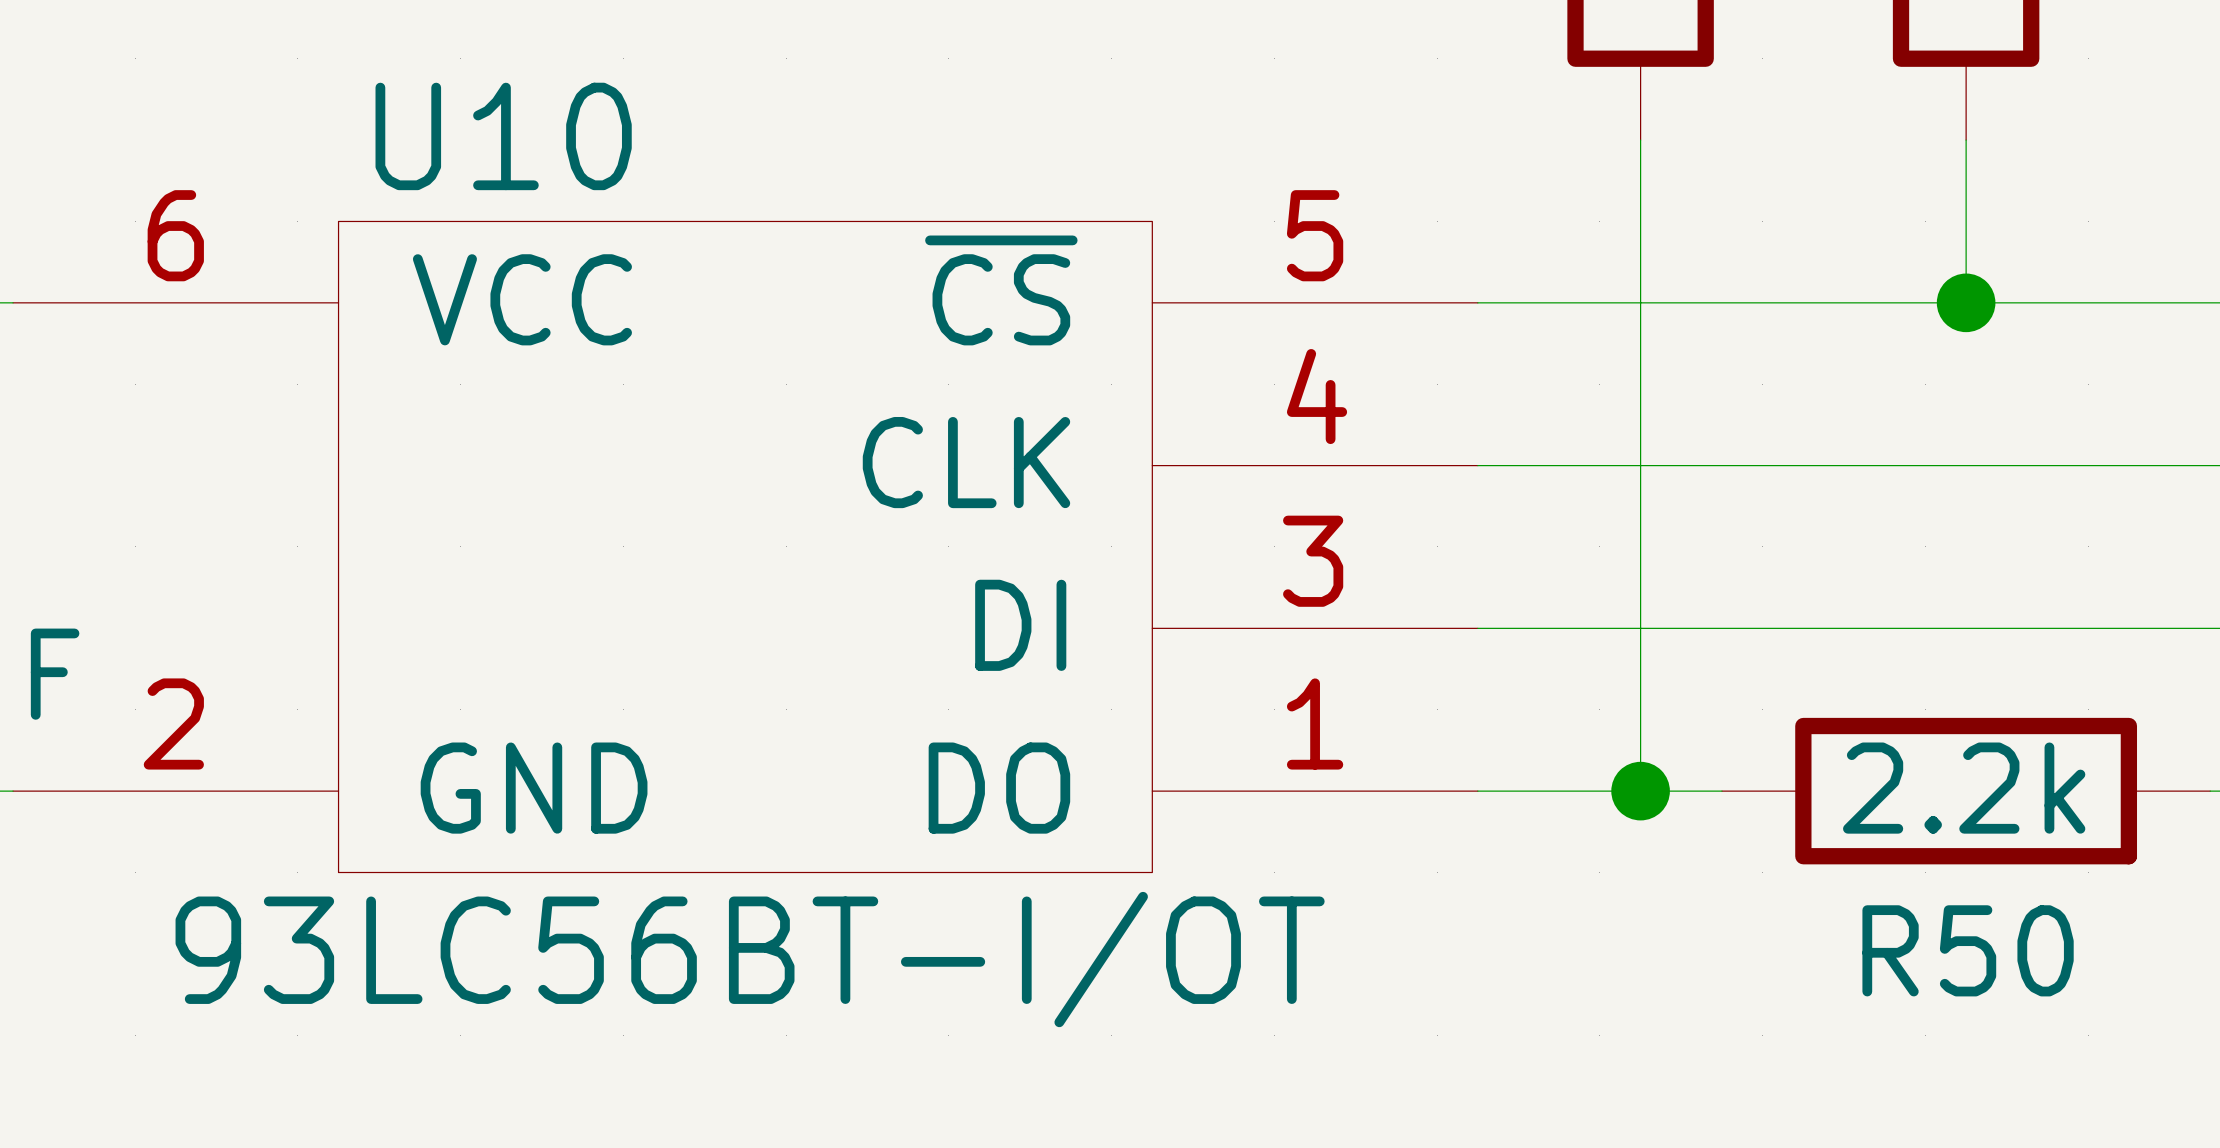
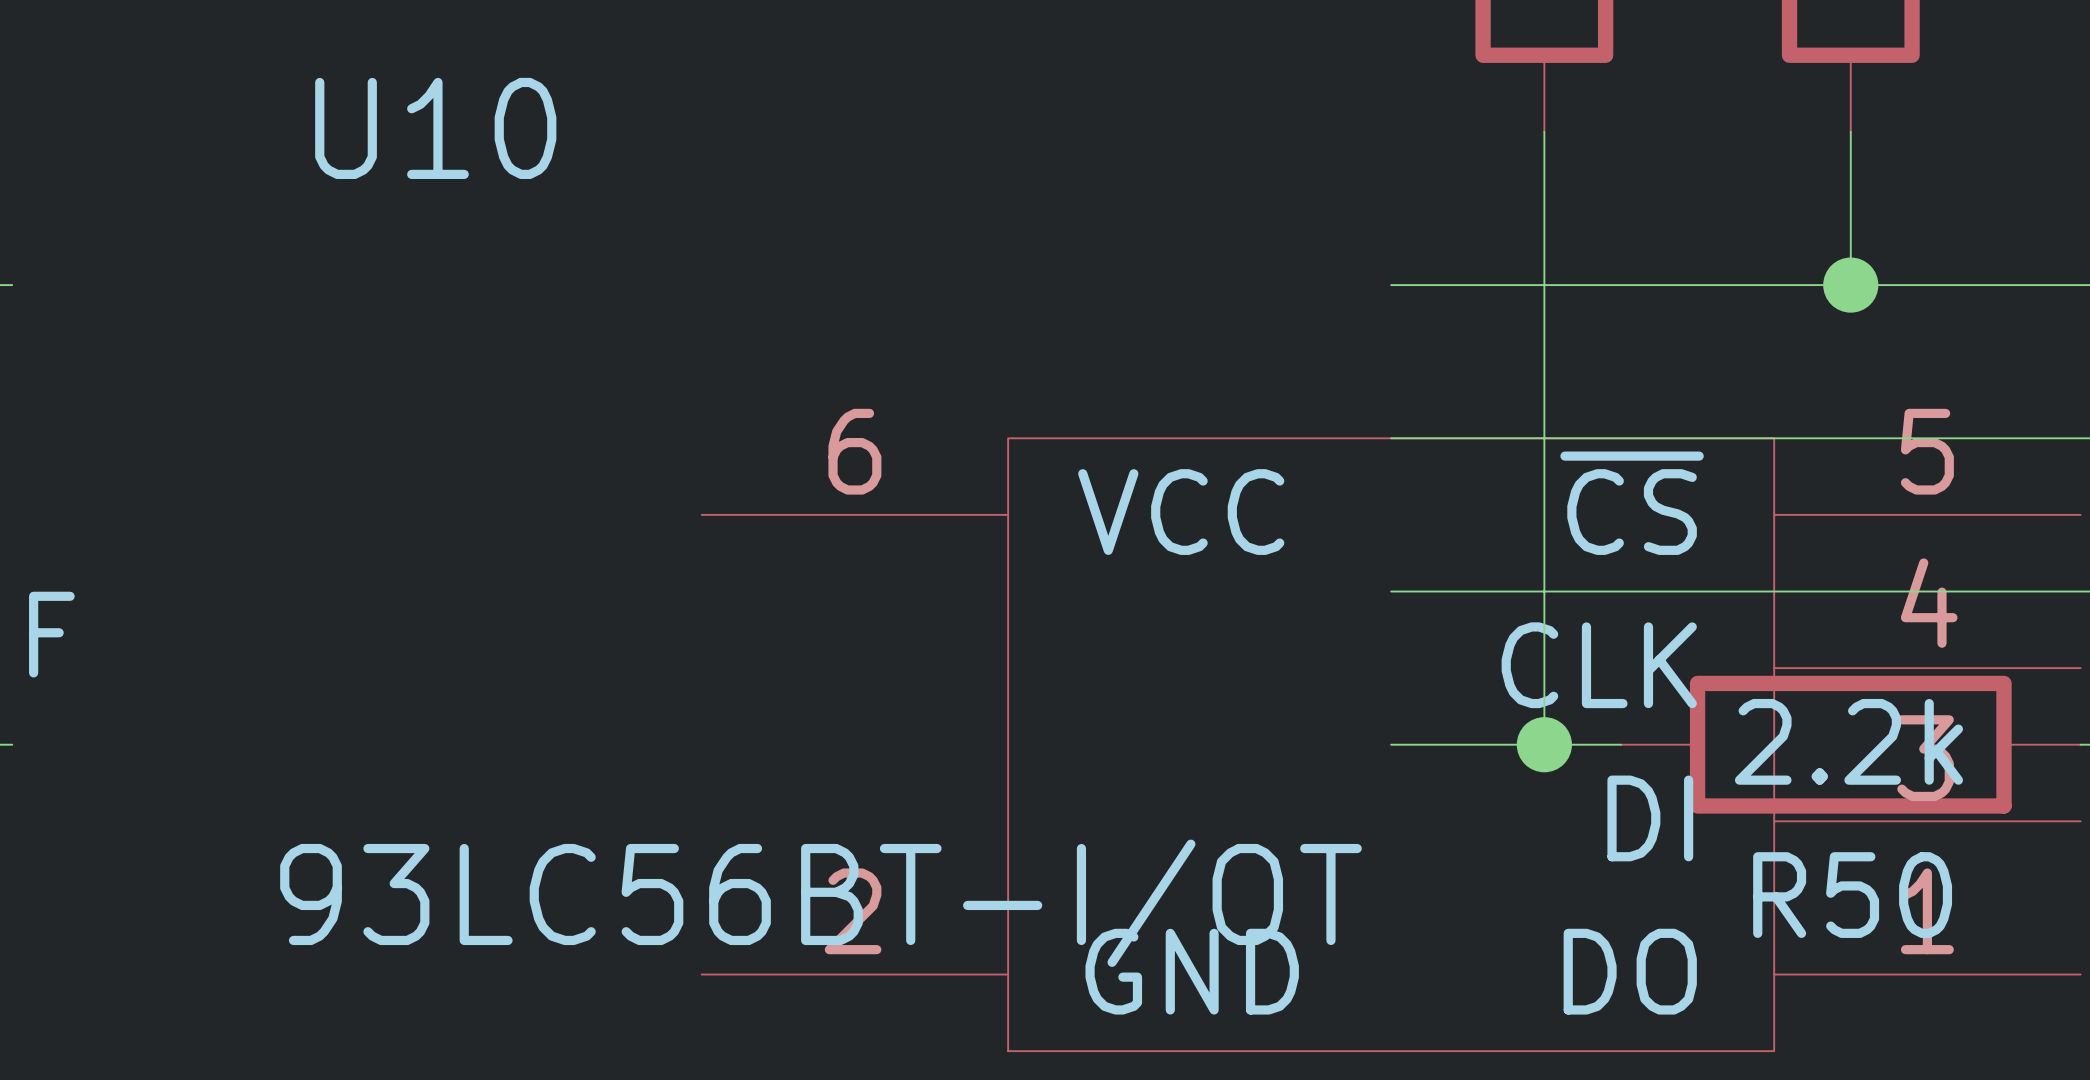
U10 name position: U10 (503, 136) -> U10 (435, 128)
U10 position: (745, 546) -> (1391, 744)
U10 value position: 93LC56BT-I/OT (750, 959) -> 93LC56BT-I/OT (820, 903)

